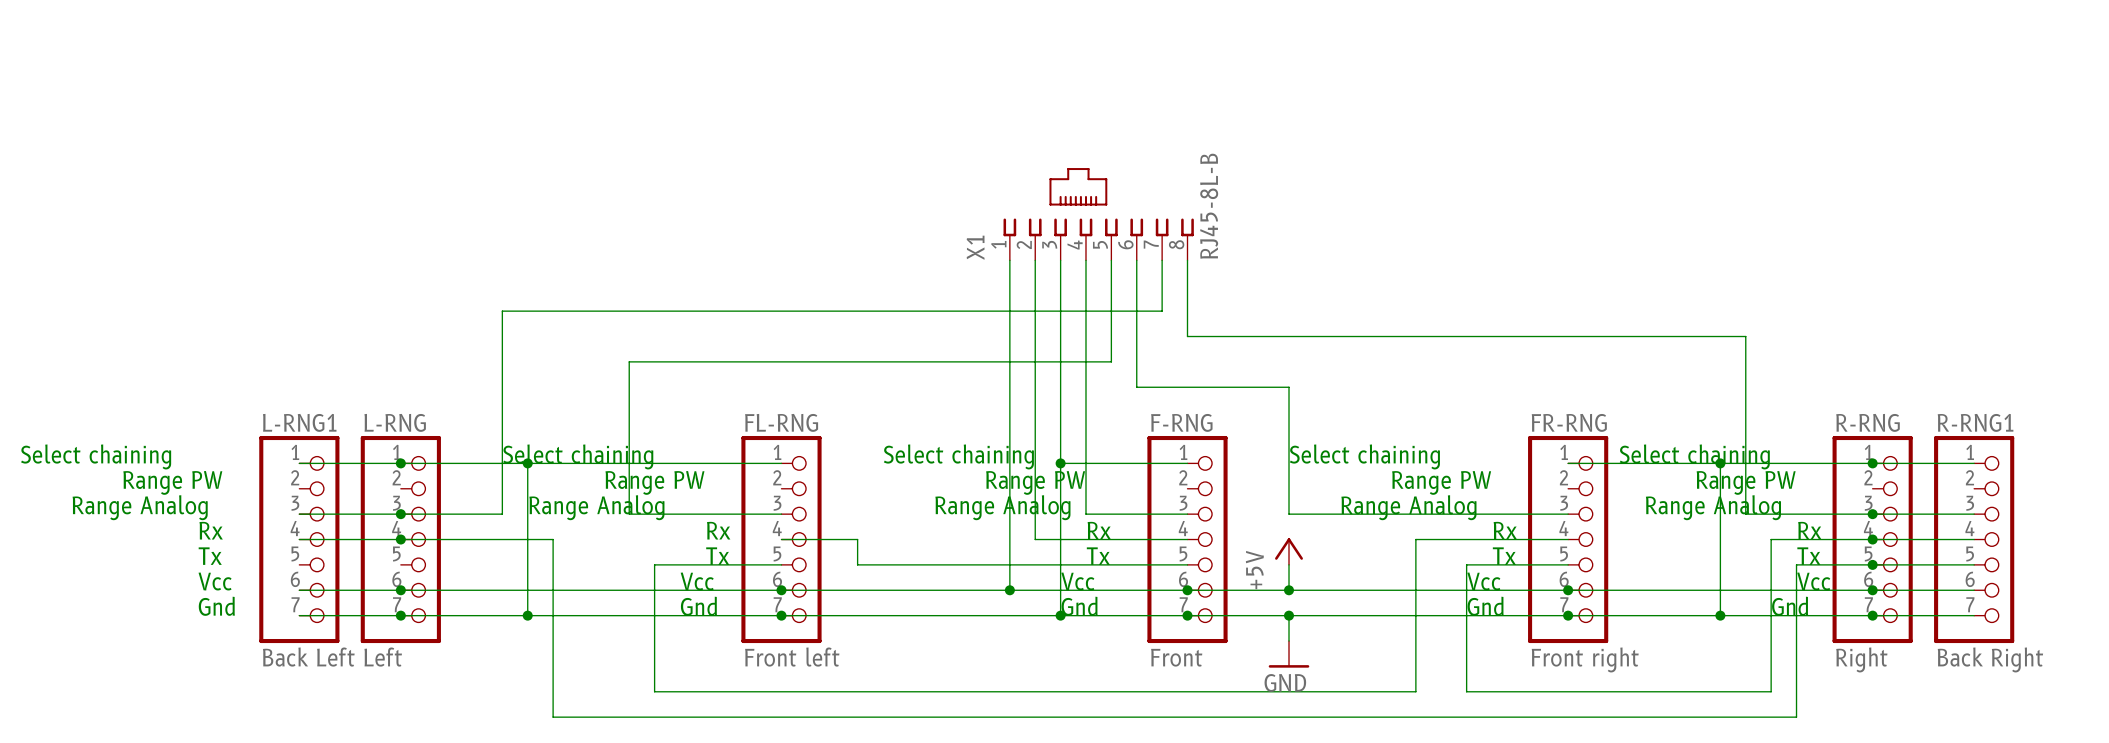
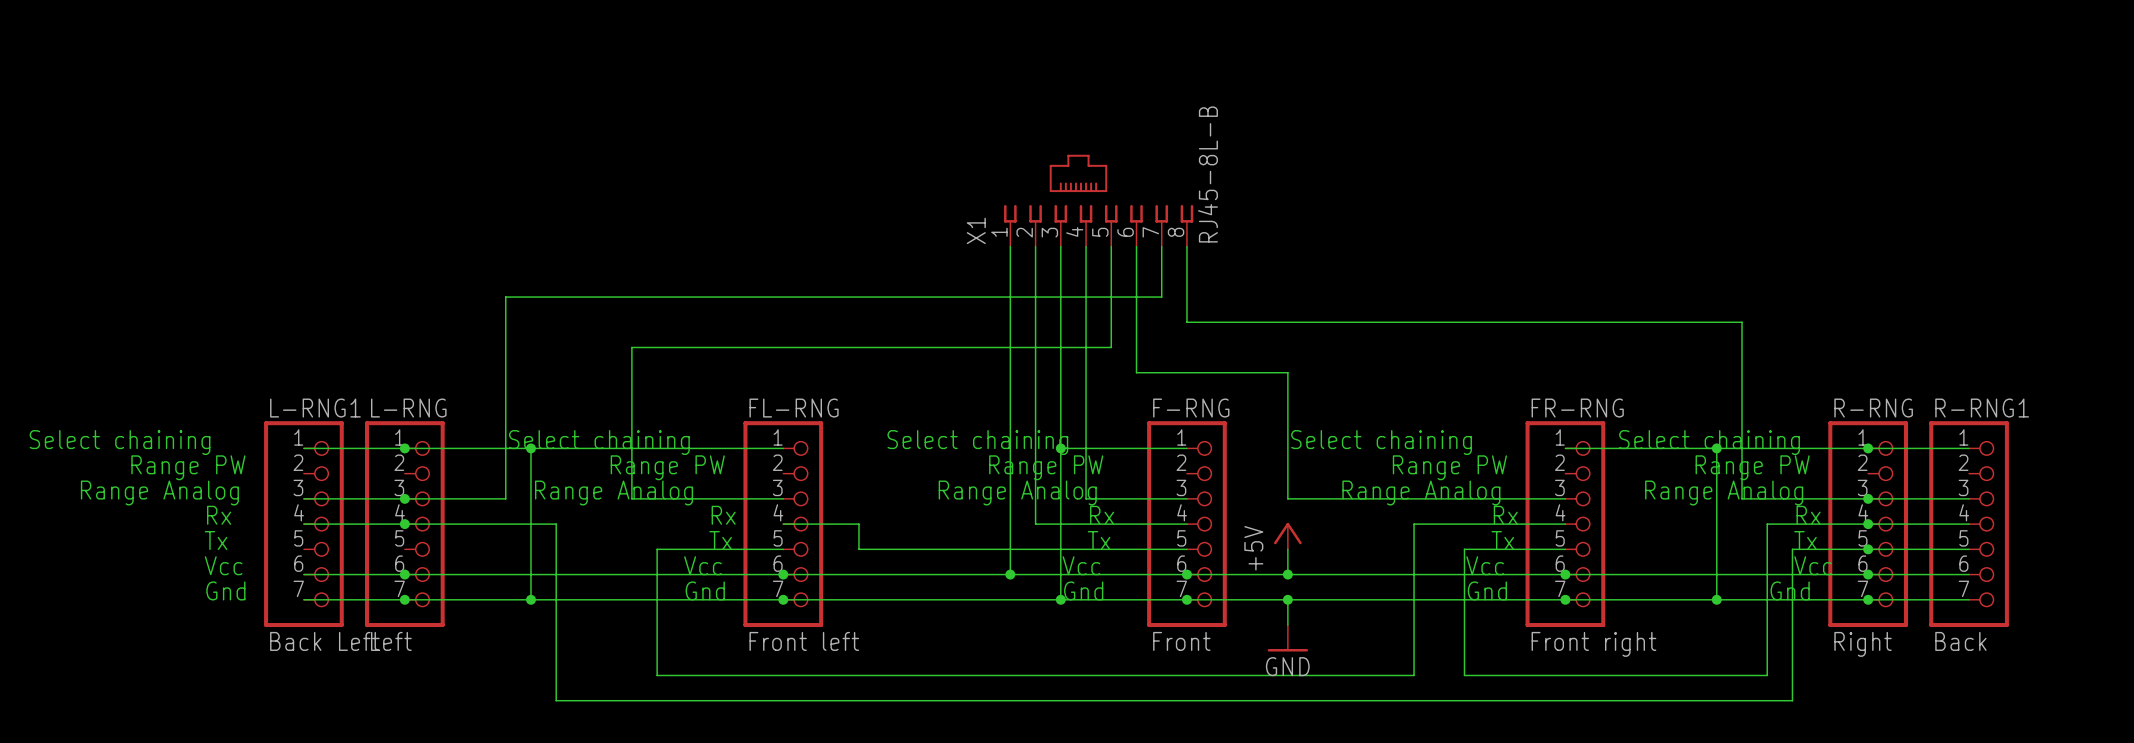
R-RNG1 value: Back Right (1990, 659) -> Back (1960, 641)

